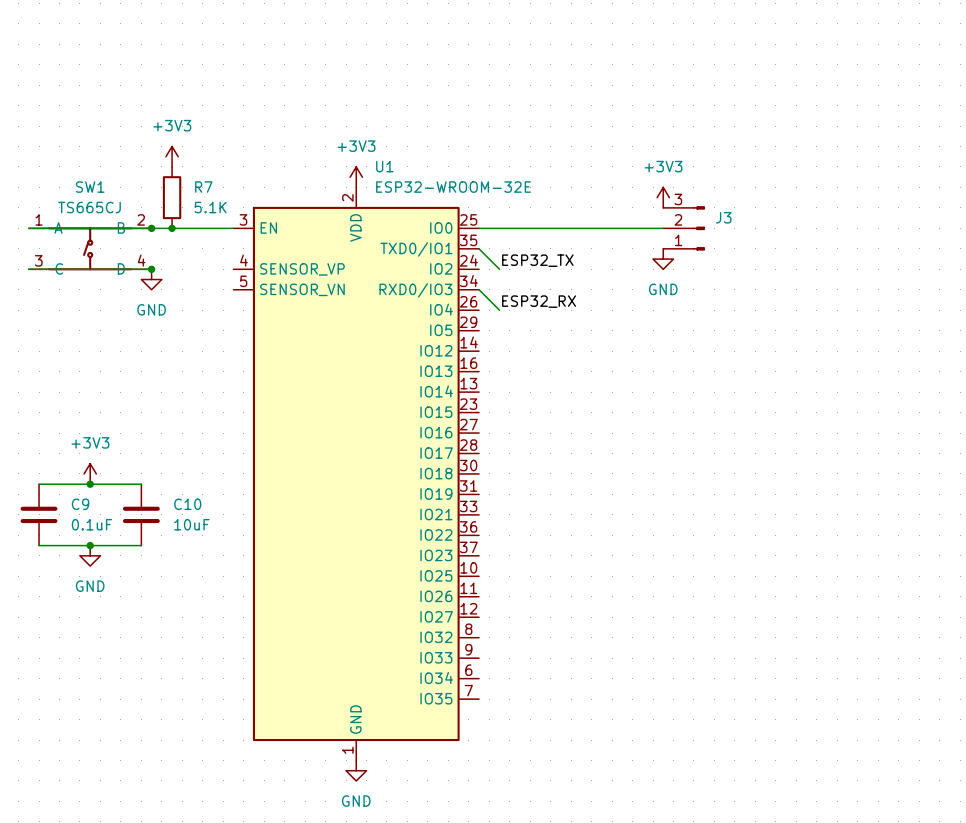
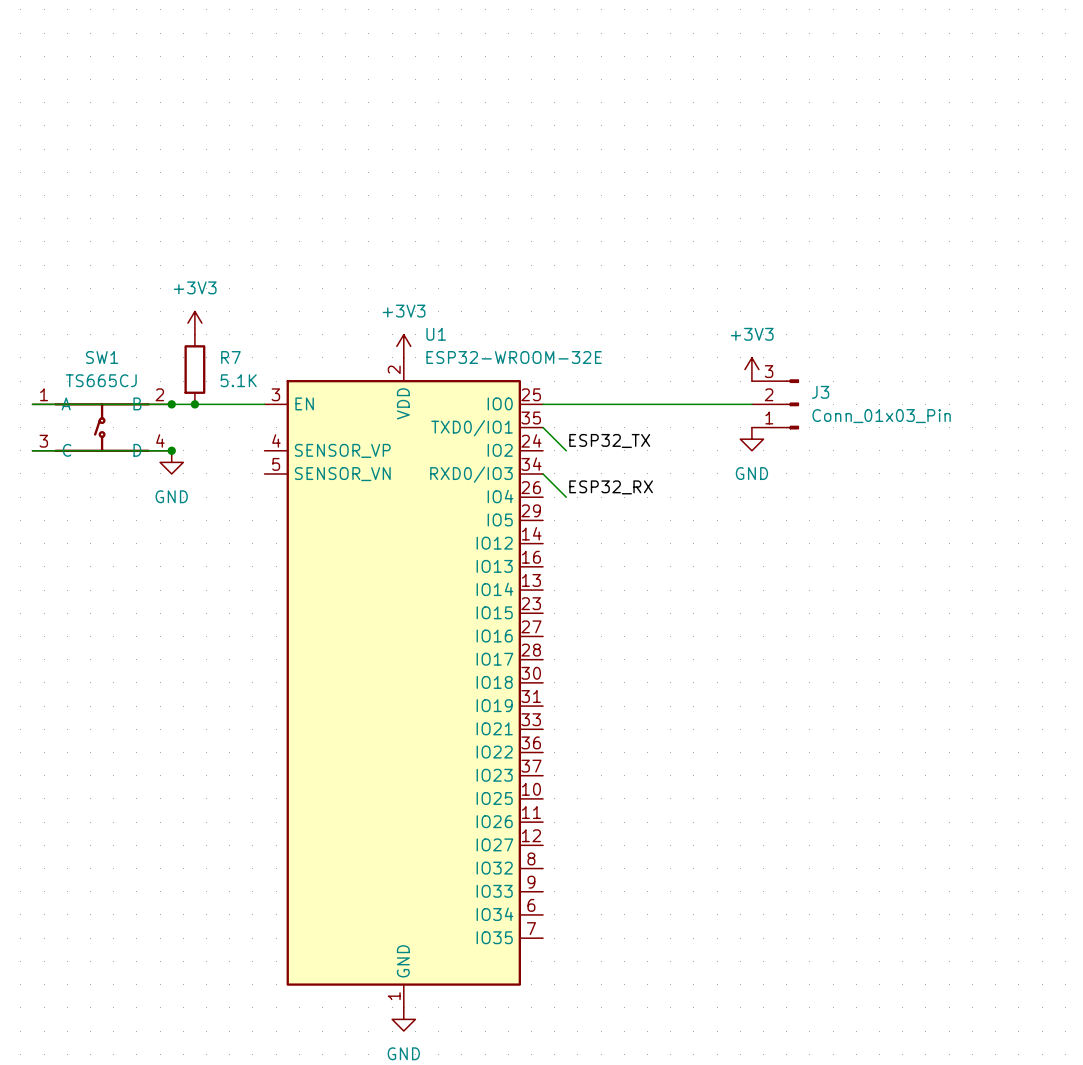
J3 value: none -> Conn_01x03_Pin (881, 416)
power symbol: +3V3 (90, 473) -> none
wire: (39, 484) (141, 484) -> none
junction: (90, 484) -> none
C9: 0.1uF (39, 514) -> none
C10: 10uF (141, 514) -> none
wire: (39, 545) (141, 545) -> none
junction: (90, 545) -> none
power symbol: GND (90, 555) -> none

